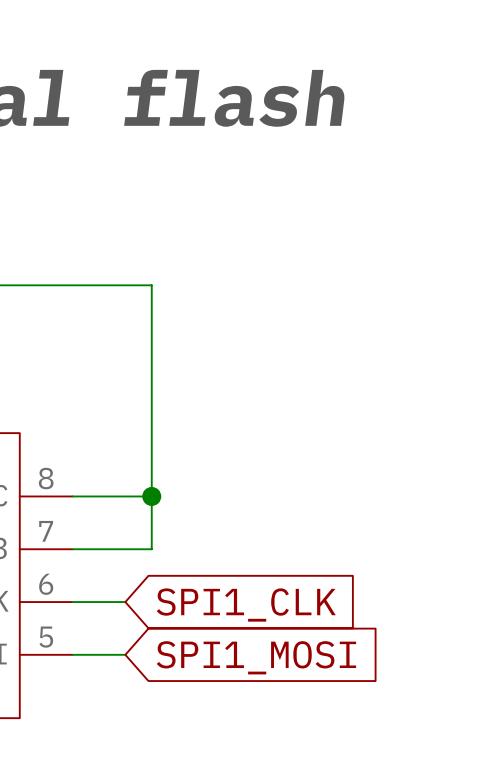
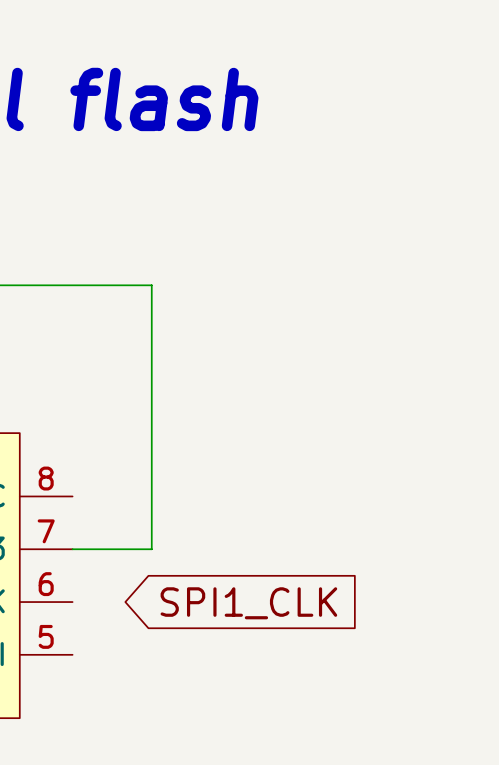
wire: (72, 496) (151, 496) -> none
junction: (151, 496) -> none
wire: (72, 602) (125, 602) -> none
wire: (72, 654) (125, 654) -> none
global label: SPI1_MOSI (256, 657) -> none

